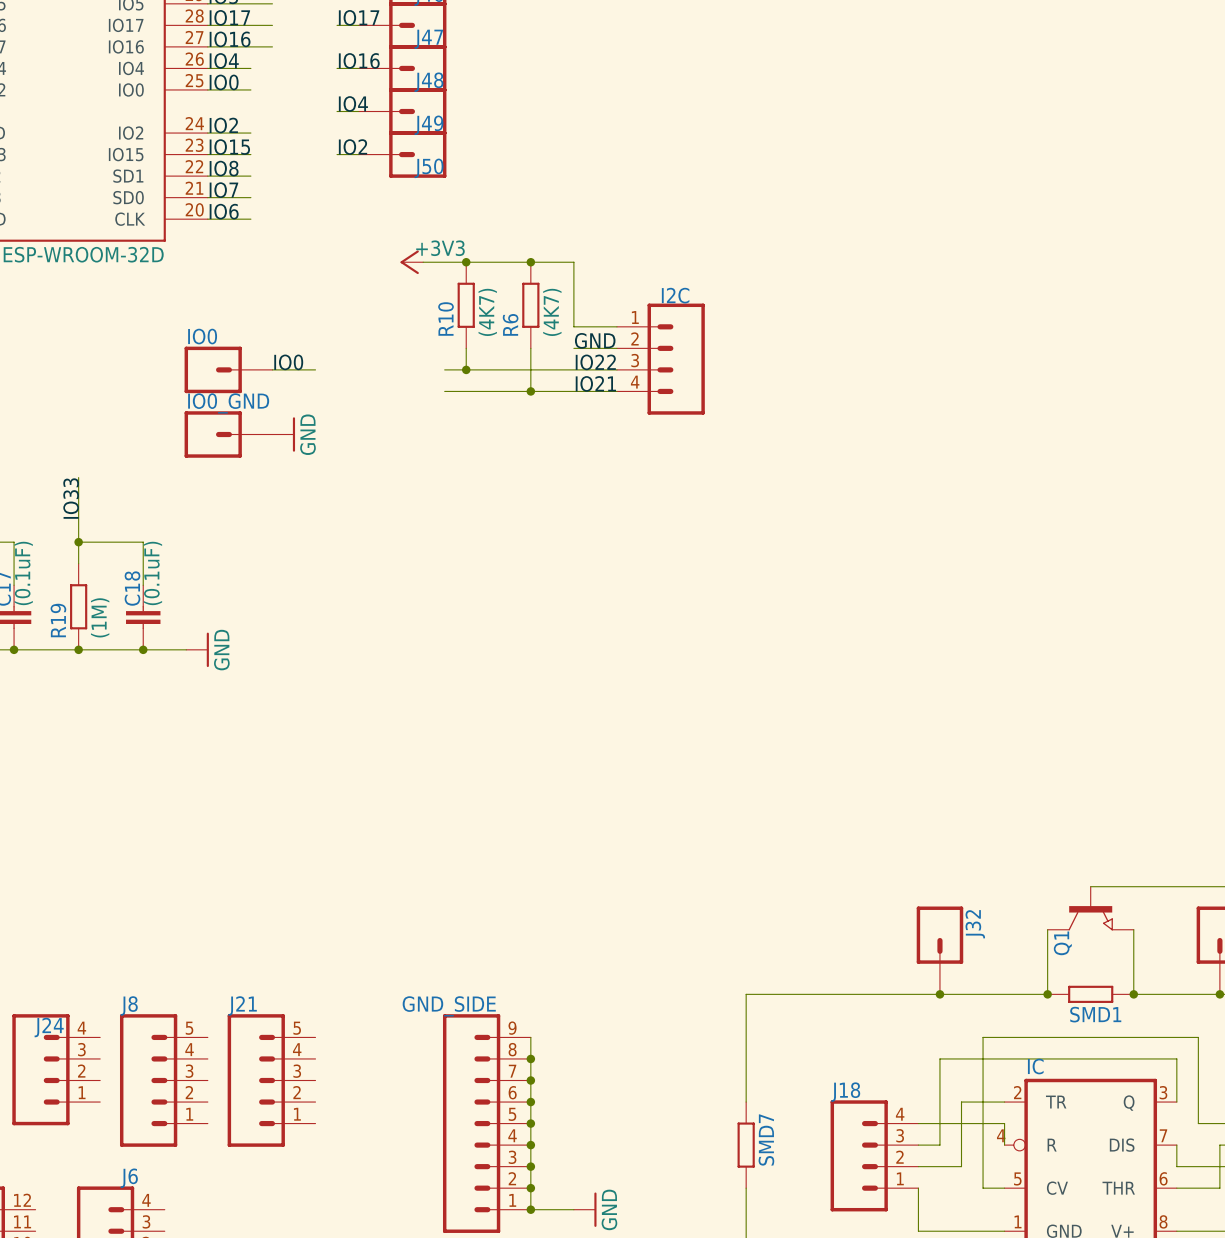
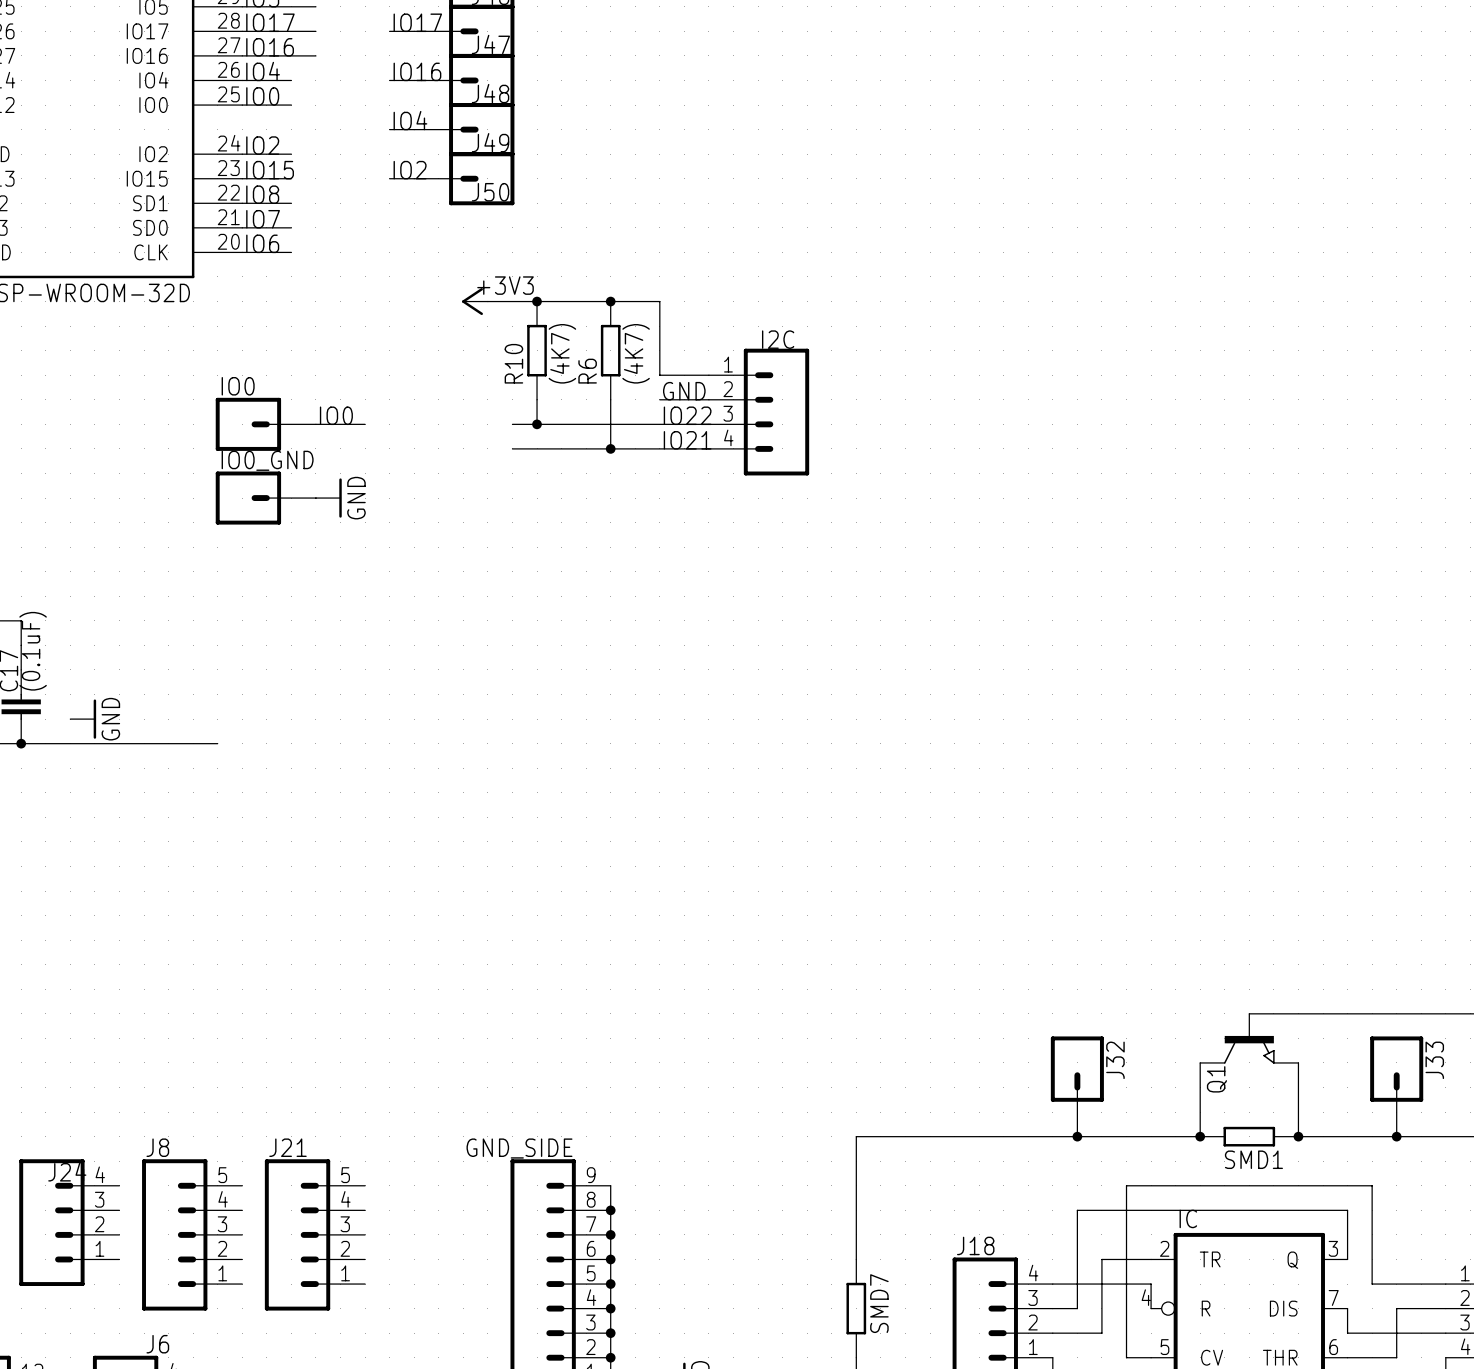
wire: (78, 477) (78, 563) -> none
label: IO33 (71, 498) -> none
wire: (78, 542) (143, 542) (143, 585) -> none
junction: (78, 542) -> none
R19: (1M) (78, 606) -> none
C18: (0.1uF) (143, 617) -> none
junction: (78, 649) -> none
junction: (143, 649) -> none
power symbol position: GND (197, 649) -> GND (83, 719)

